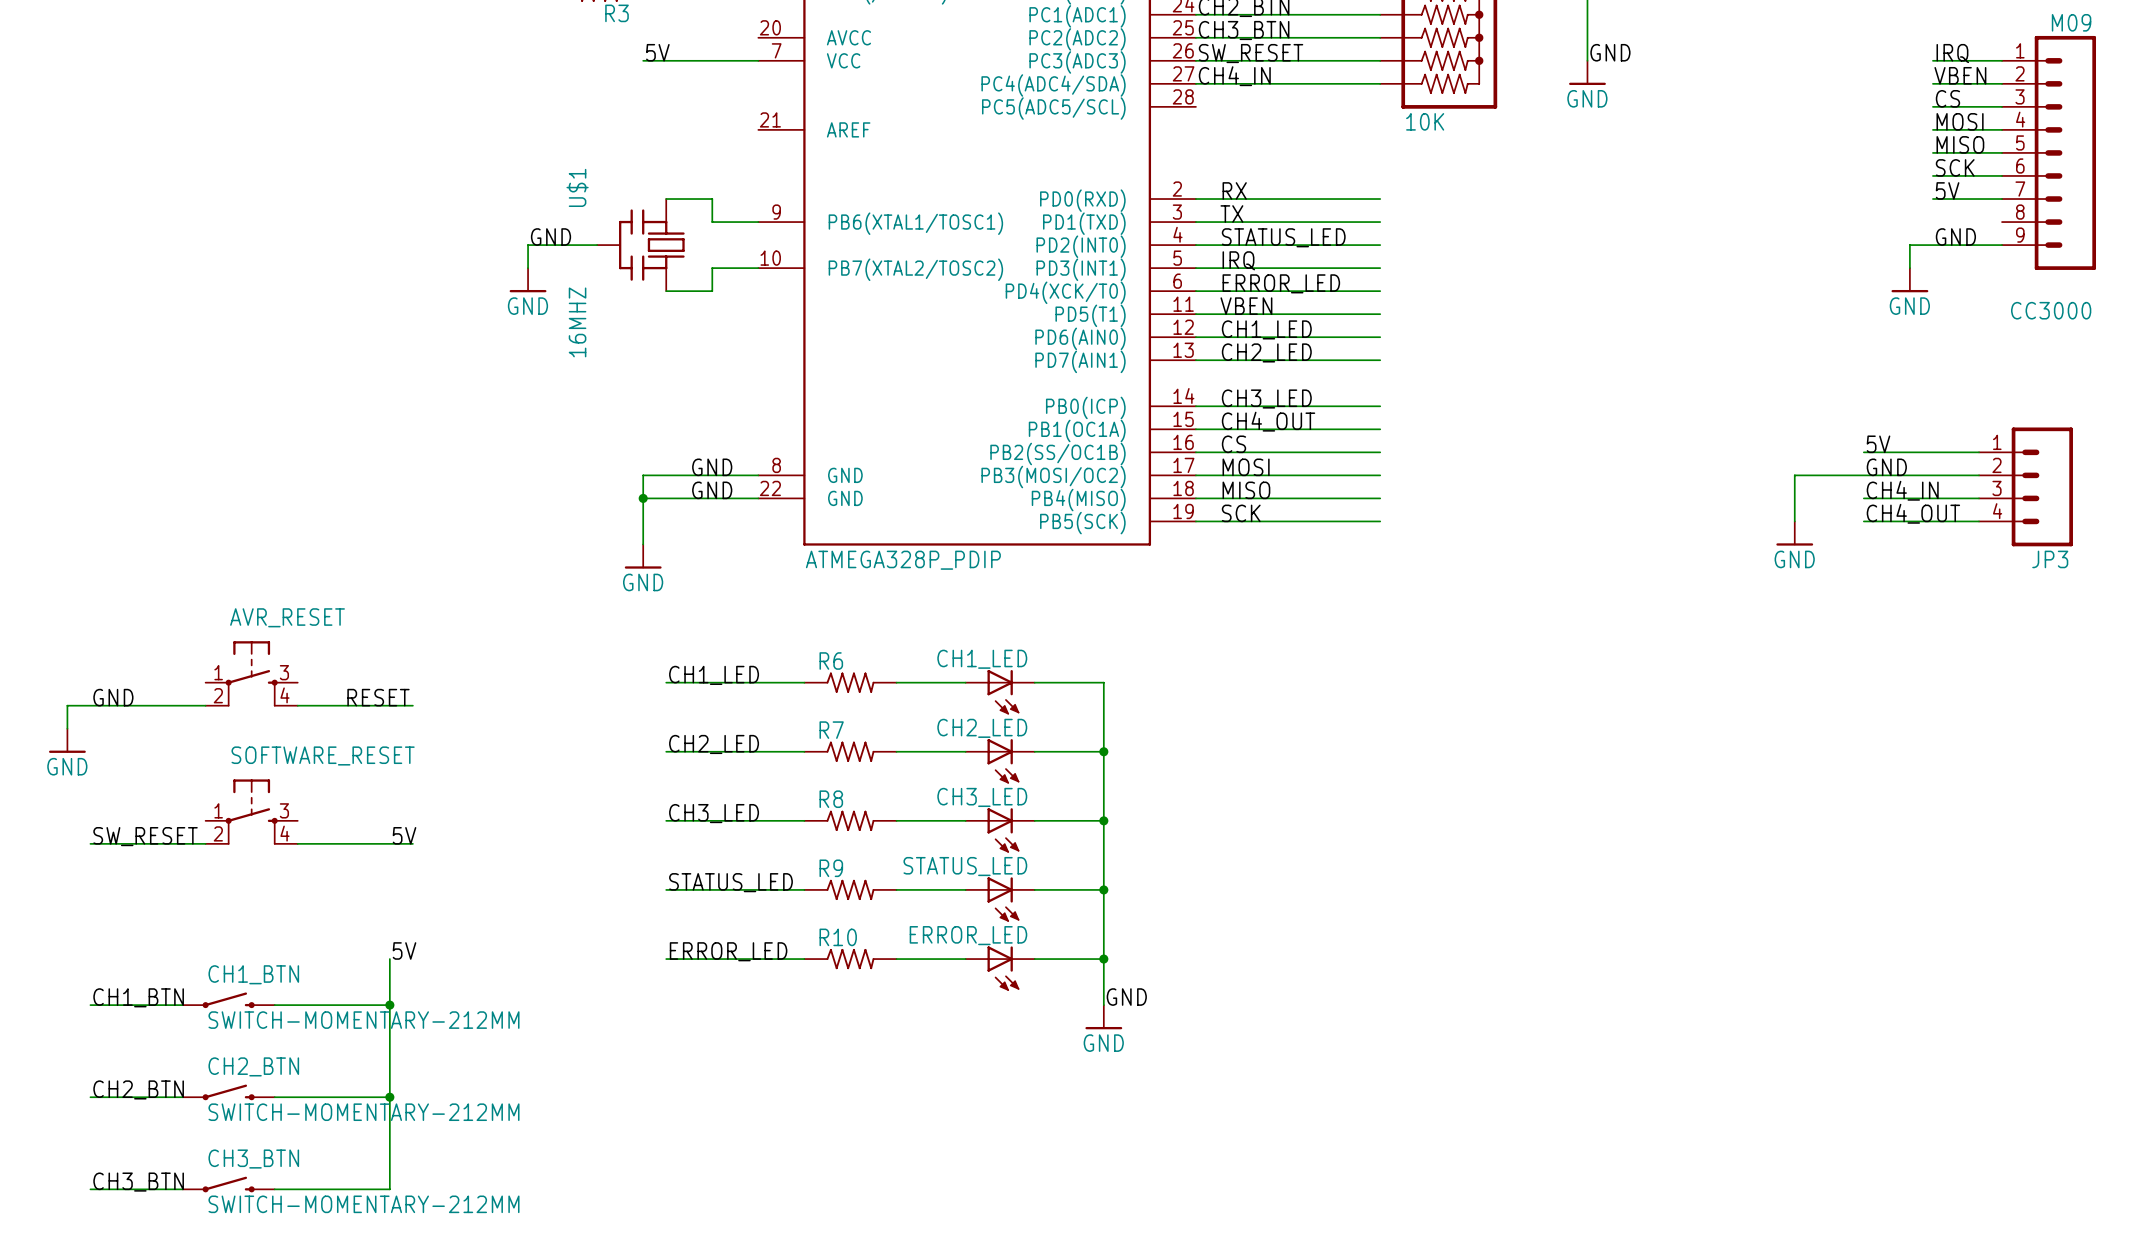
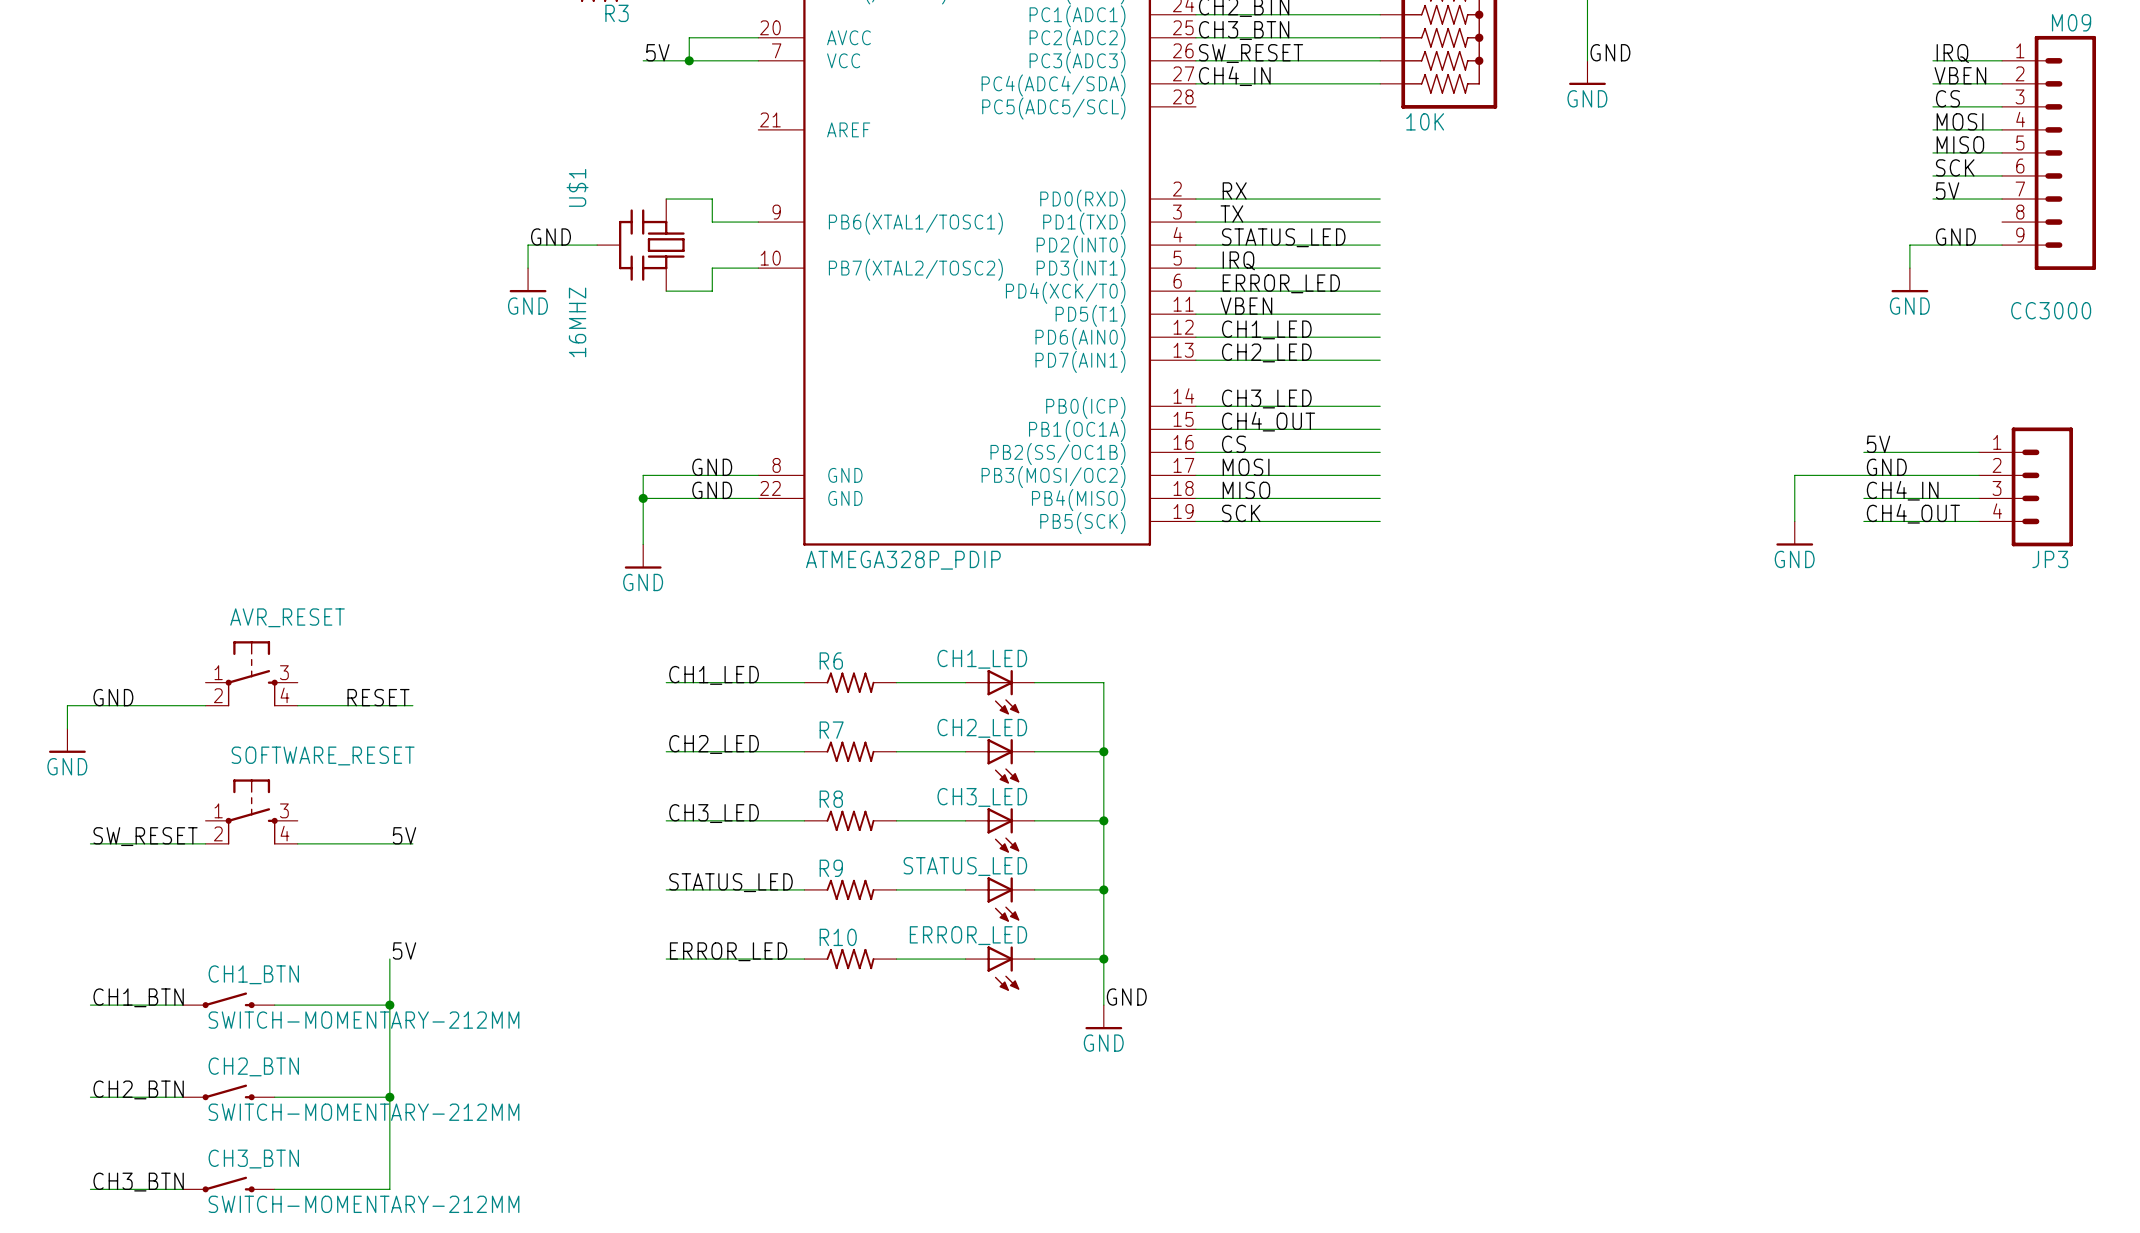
wire: none -> (758, 37) (689, 37) (689, 60)
junction: none -> (689, 60)

